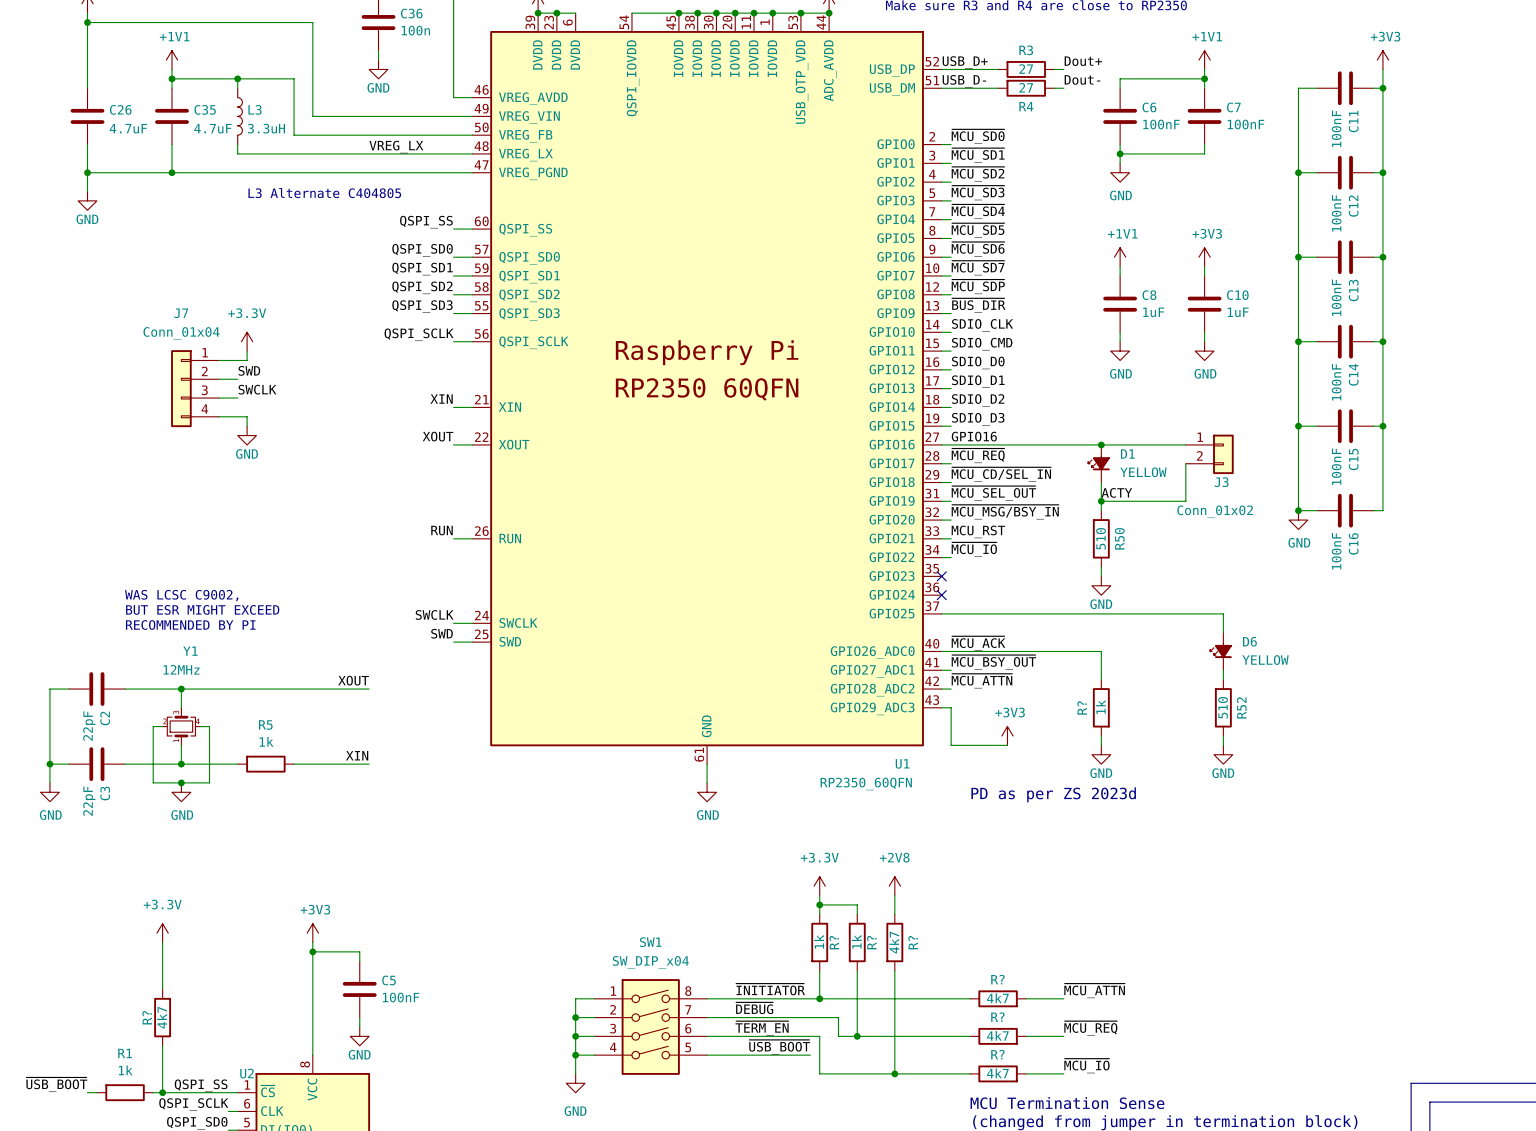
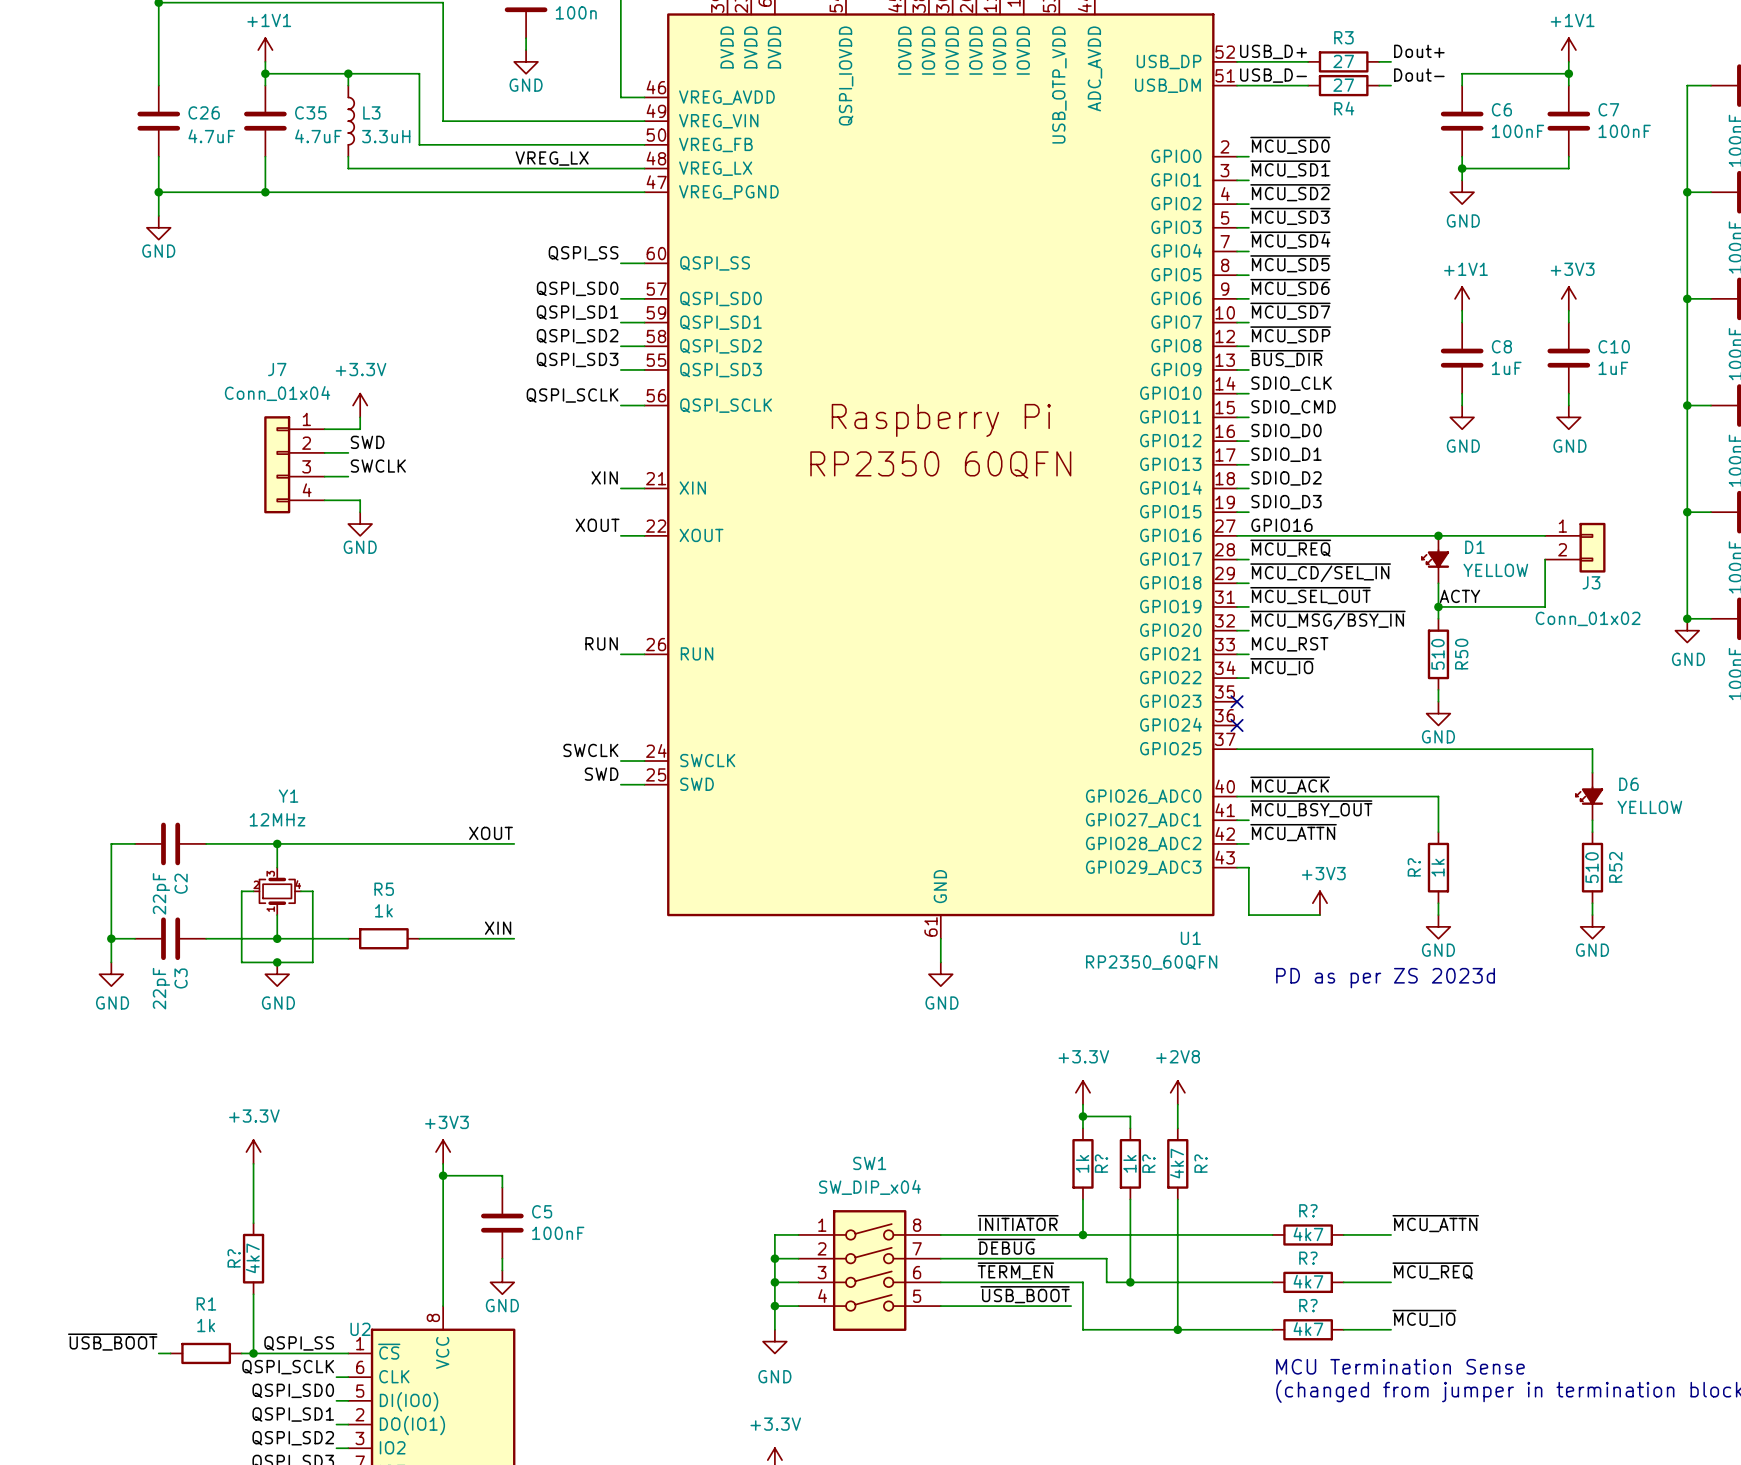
text: L3 Alternate C404805 (324, 193) -> none
text: WAS LCSC C9002, (181, 595) -> none
text: BUT ESR MIGHT EXCEED (202, 609) -> none
text: RECOMMENDED BY PI (190, 625) -> none

